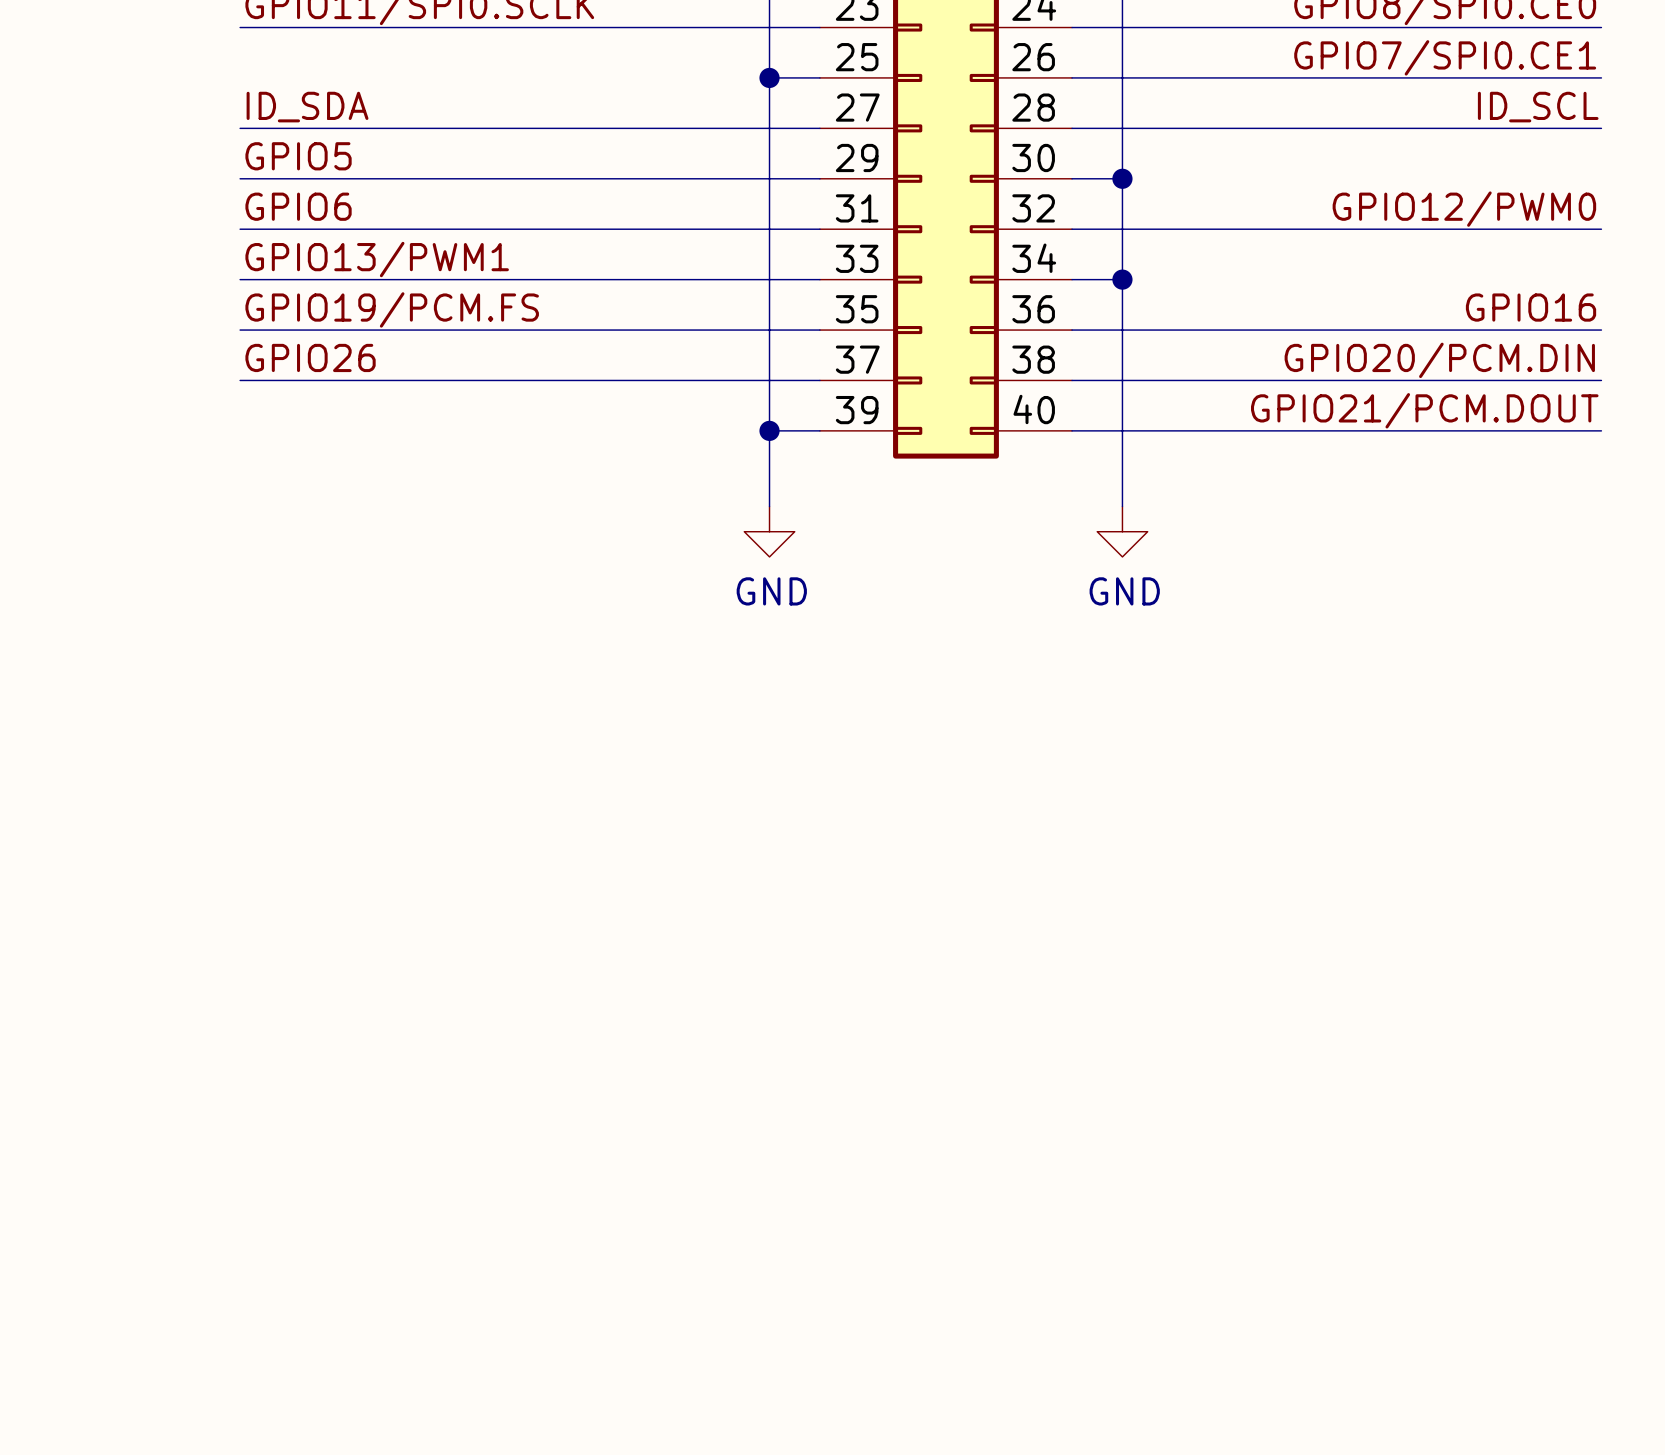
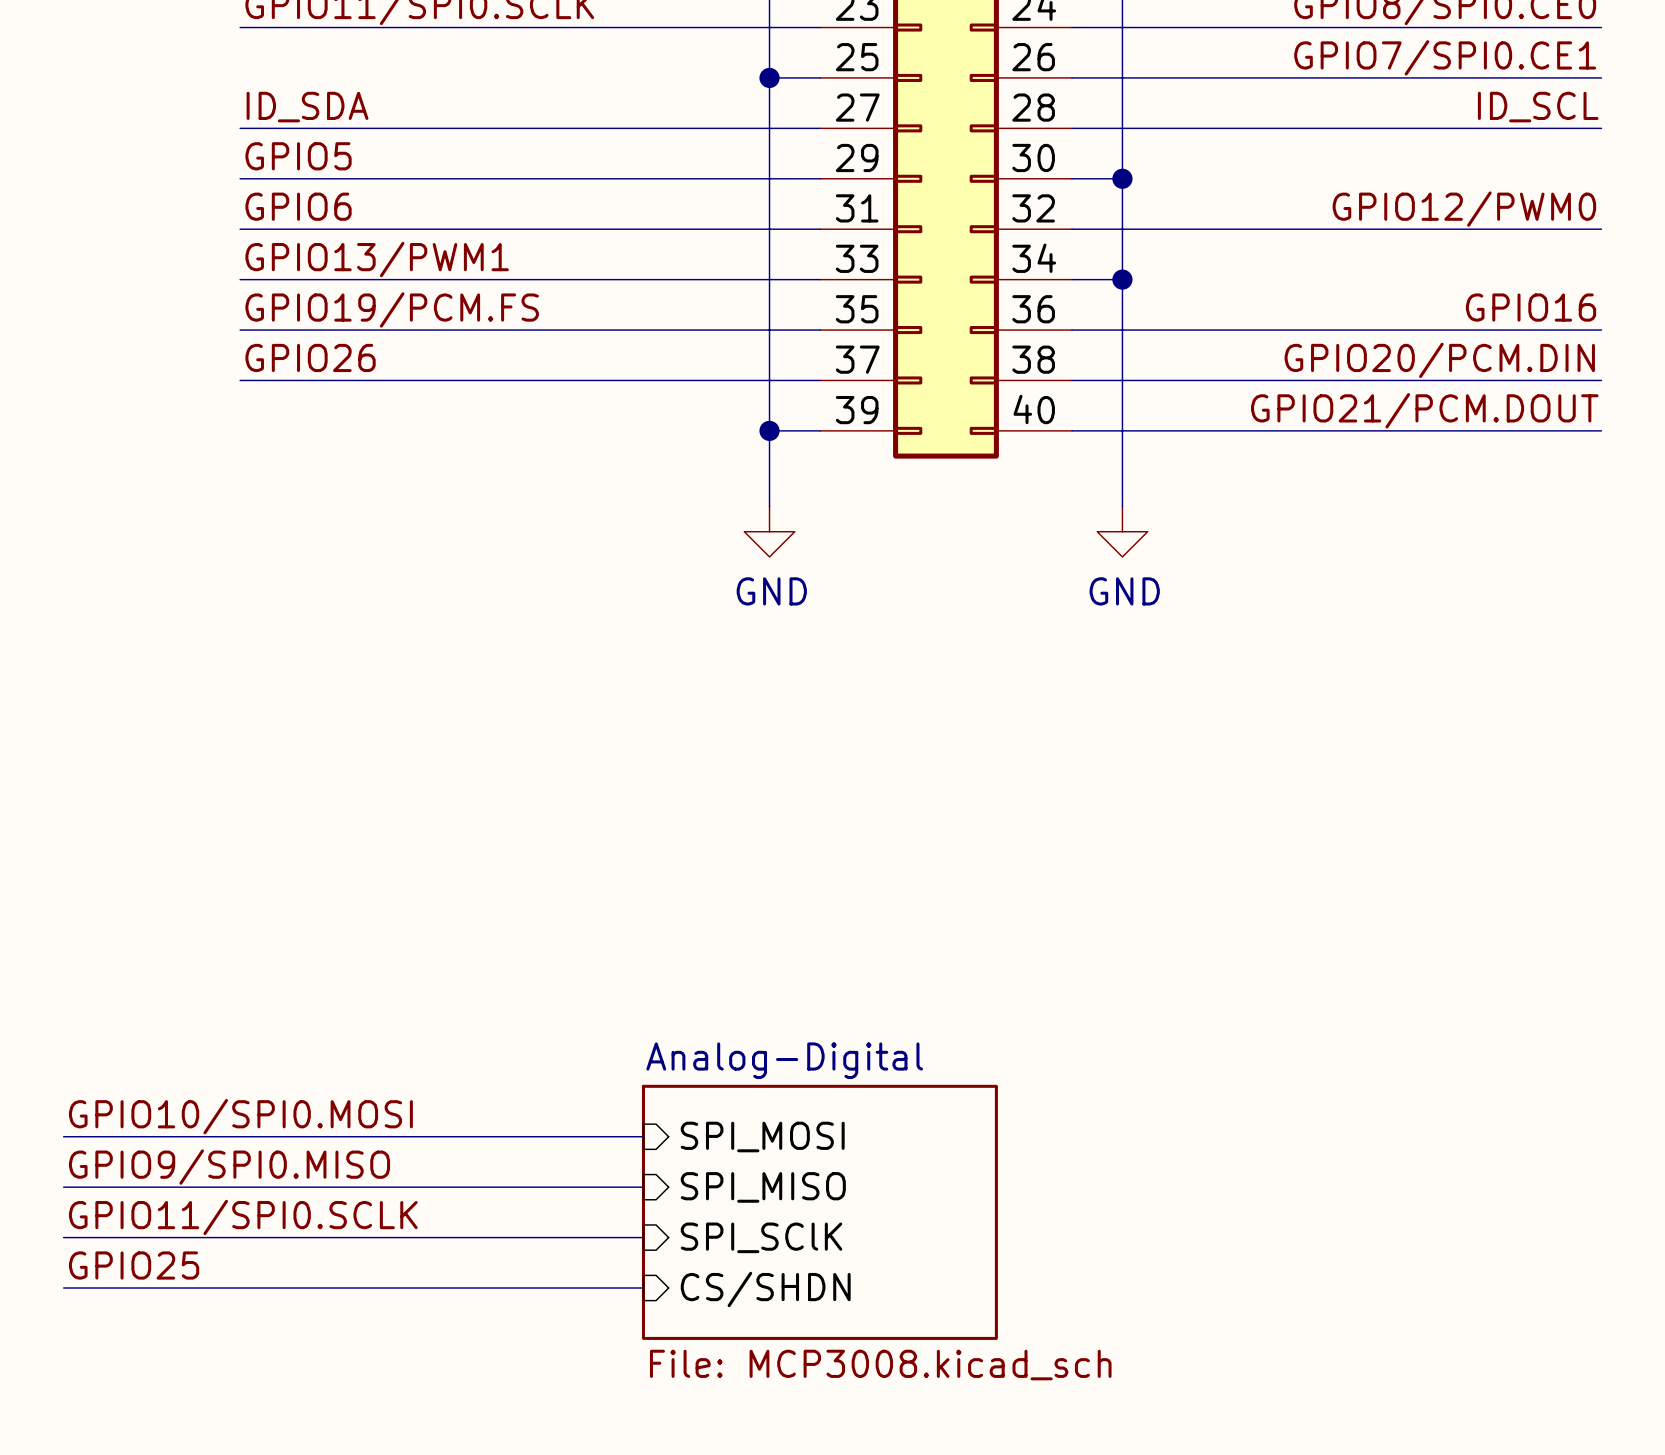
label: none -> GPIO10/SPI0.MOSI (240, 1116)
wire: none -> (63, 1136) (643, 1136)
sheet pin: none -> SPI_MOSI (762, 1137)
label: none -> GPIO9/SPI0.MISO (229, 1167)
wire: none -> (63, 1187) (643, 1187)
sheet pin: none -> SPI_MISO (763, 1187)
sheet Analog-Digital: none -> File: MCP3008.kicad_sch (819, 1212)
label: none -> GPIO11/SPI0.SCLK (243, 1217)
wire: none -> (63, 1237) (643, 1237)
sheet pin: none -> SPI_SClK (761, 1237)
label: none -> GPIO25 (134, 1265)
wire: none -> (63, 1288) (643, 1288)
sheet pin: none -> CS/SHDN (765, 1289)

